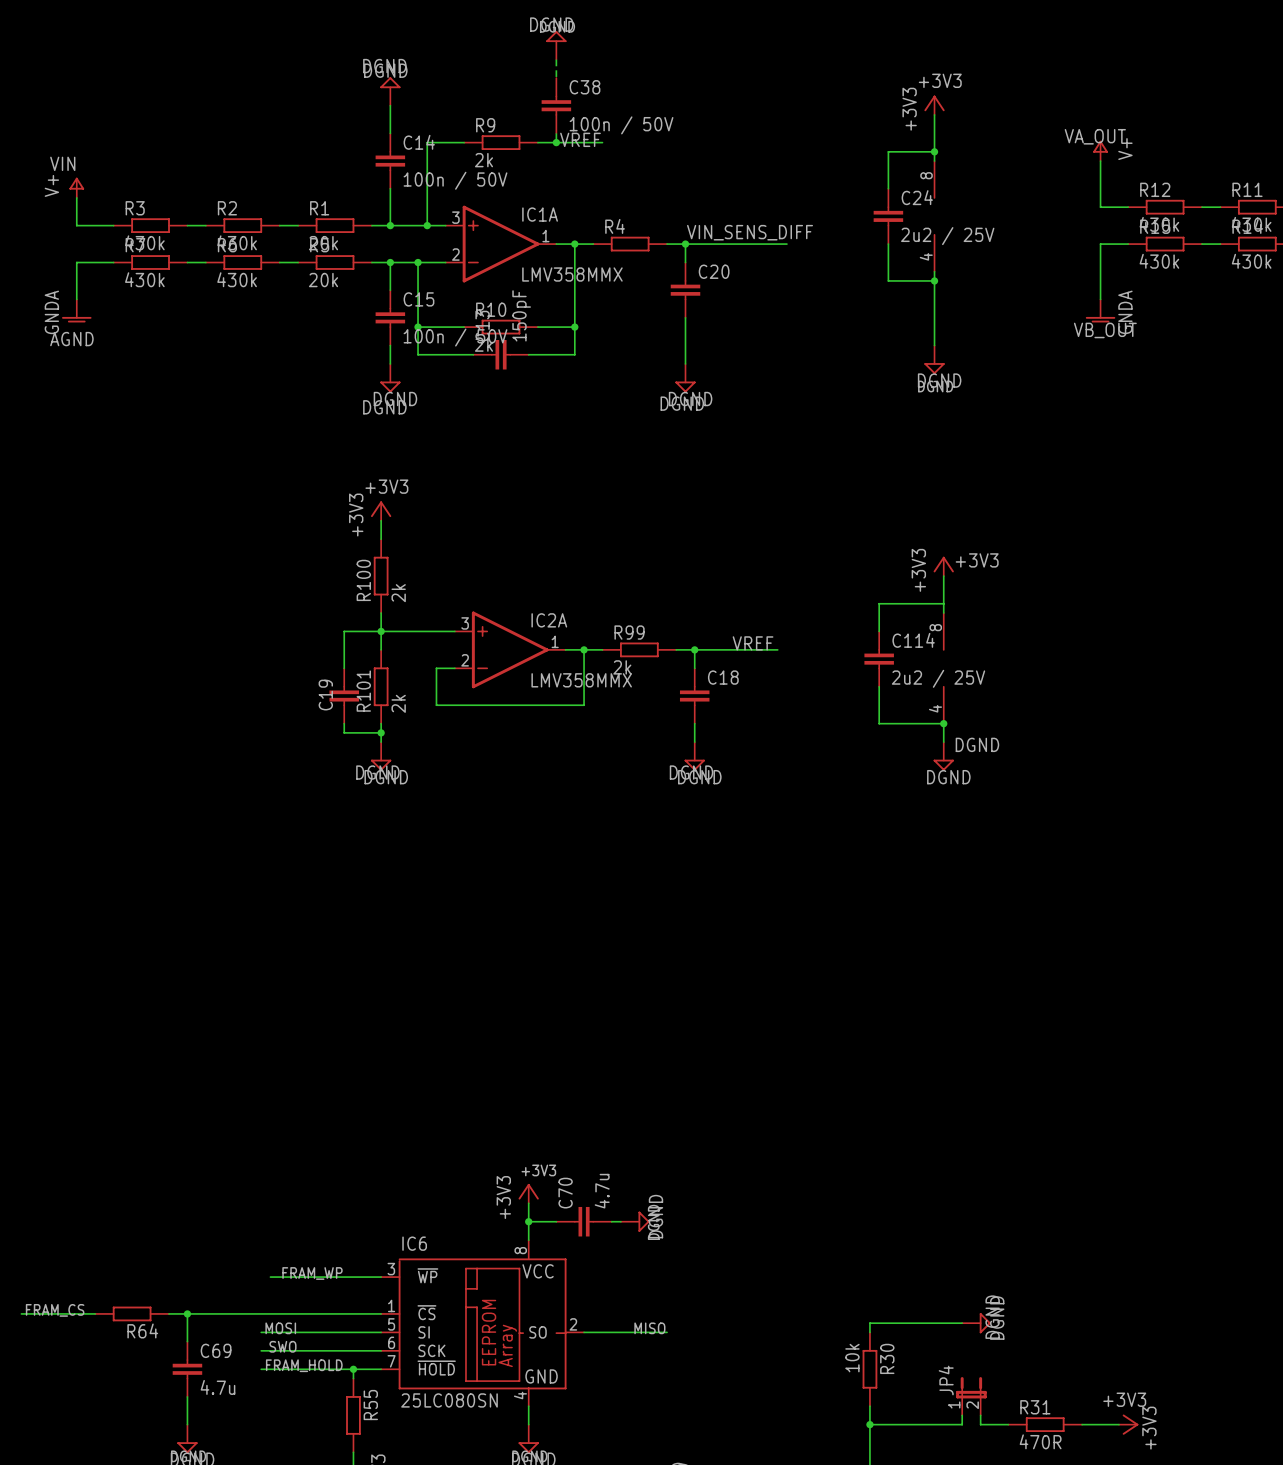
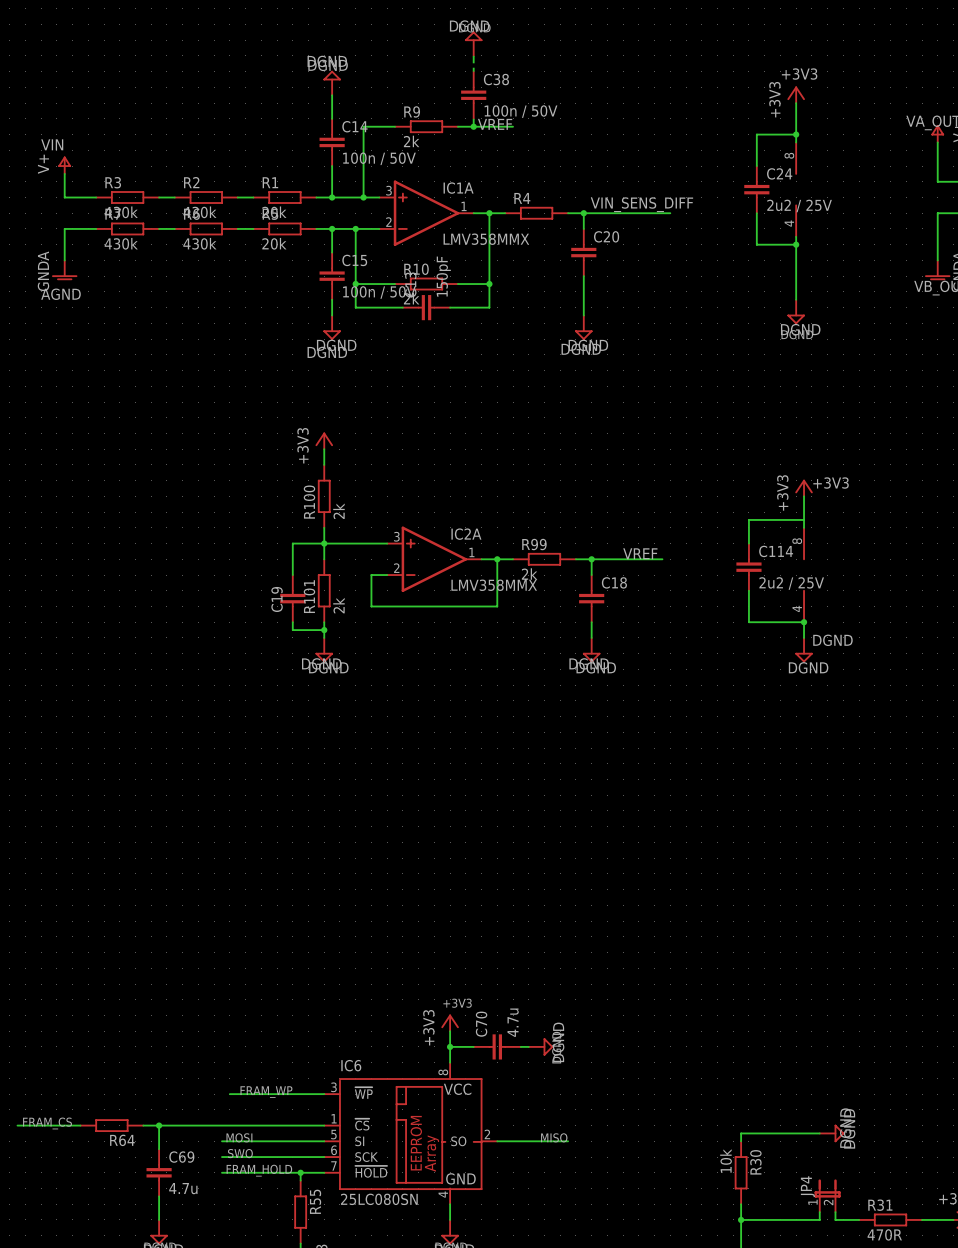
label: +3V3 (386, 486) -> none

